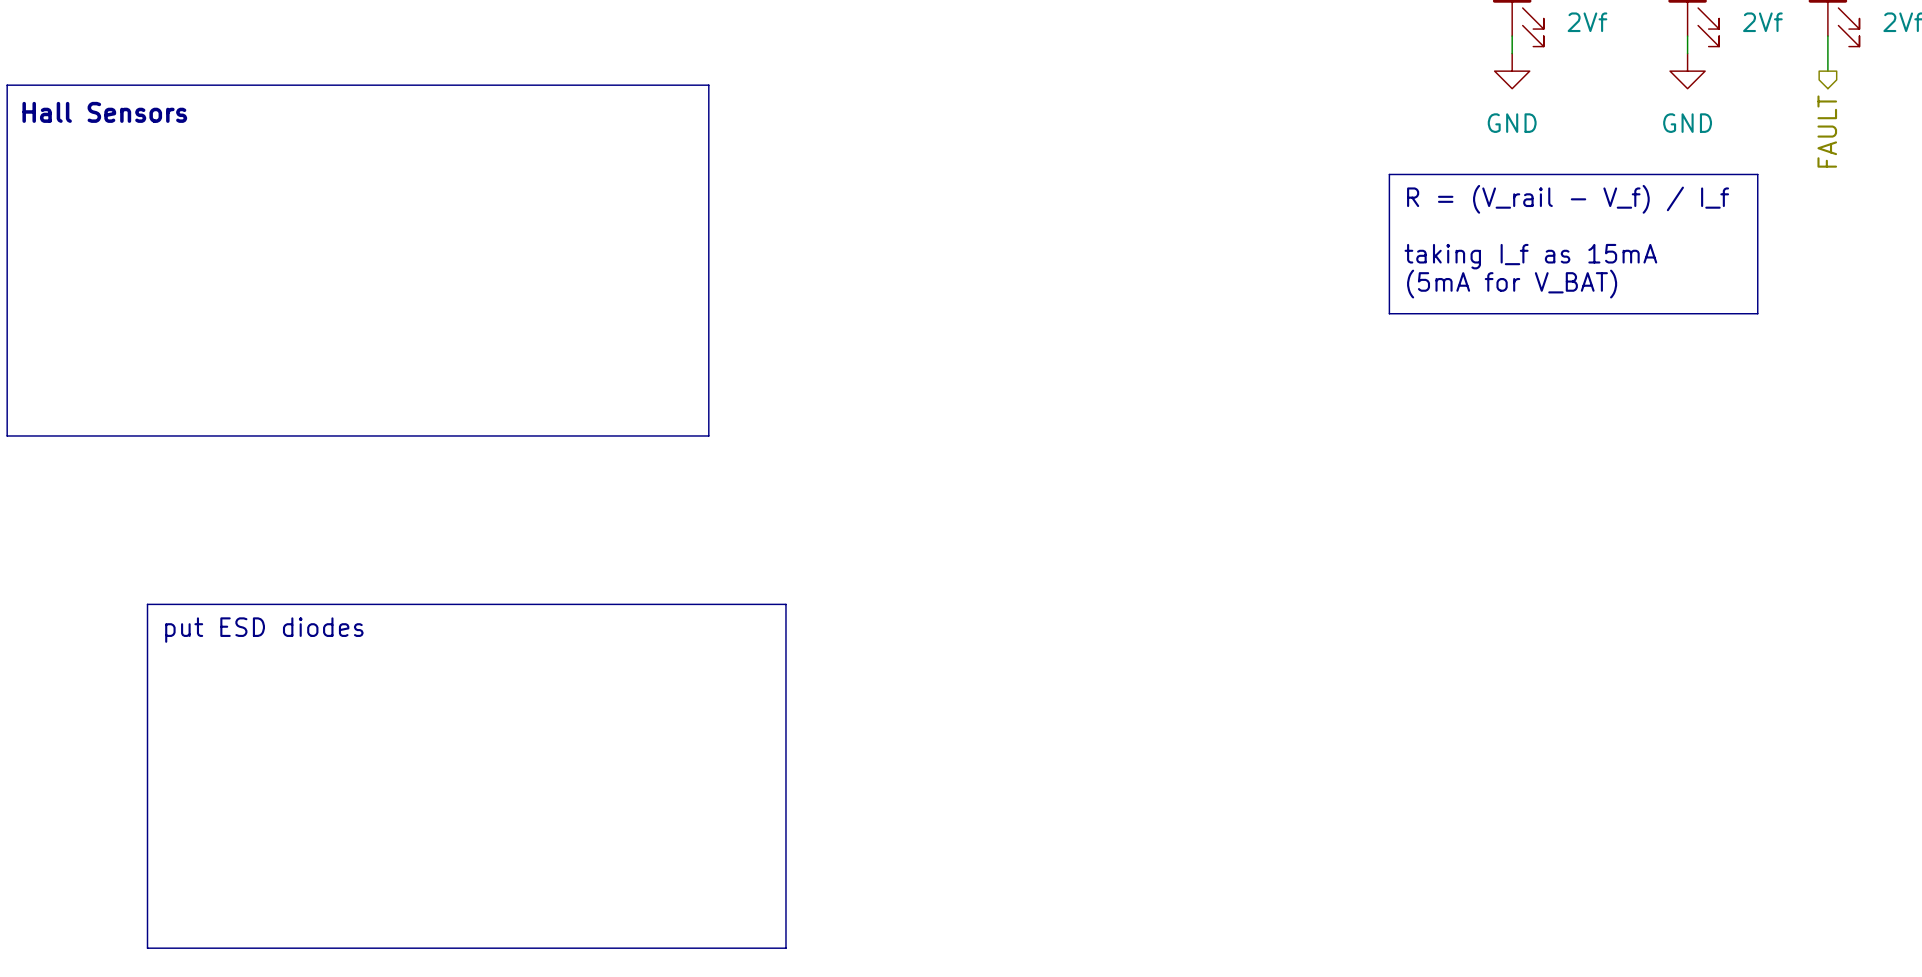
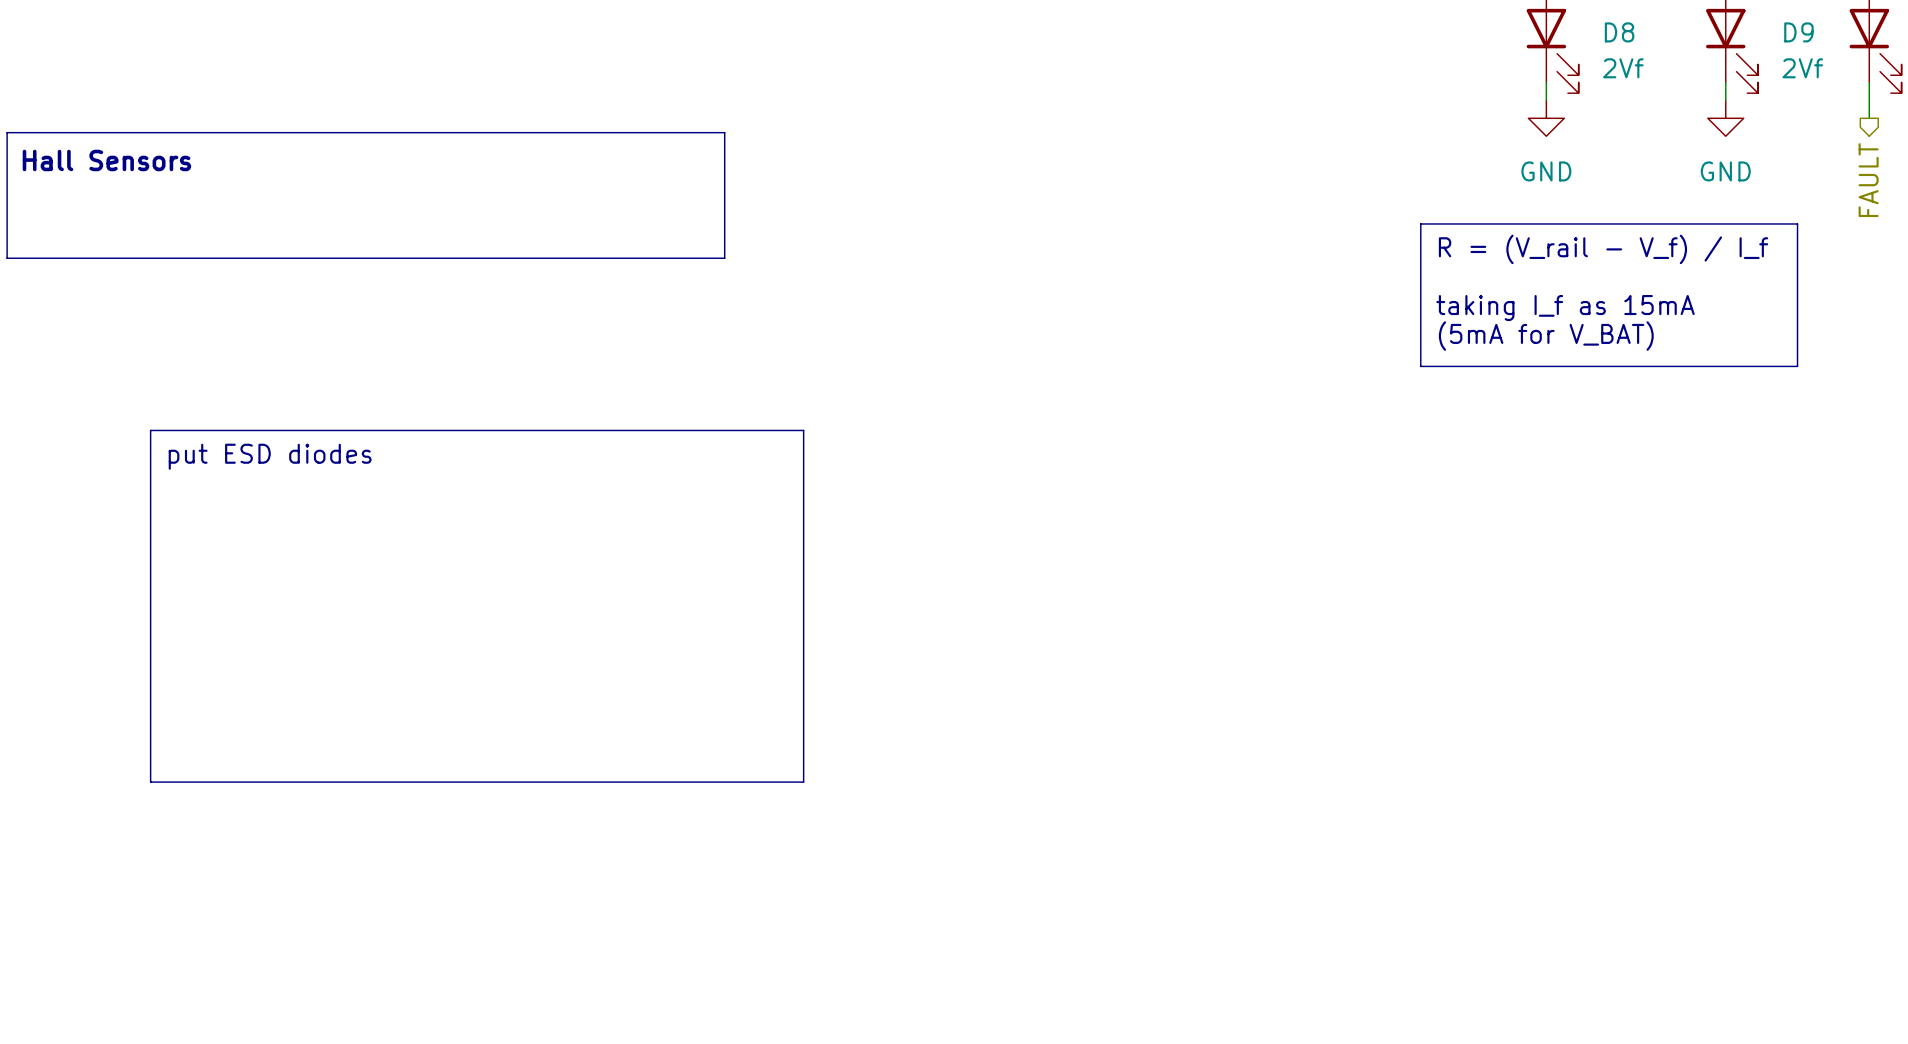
line: (7, 207) (7, 435) (708, 435) (708, 207) -> (7, 258) (724, 258)
line: (147, 604) (785, 604) -> (150, 663) (150, 430) (803, 430) (803, 663)
text position: put ESD diodes (264, 630) -> put ESD diodes (270, 456)
line: (147, 720) (147, 948) (785, 948) (785, 720) -> (150, 782) (803, 782)

